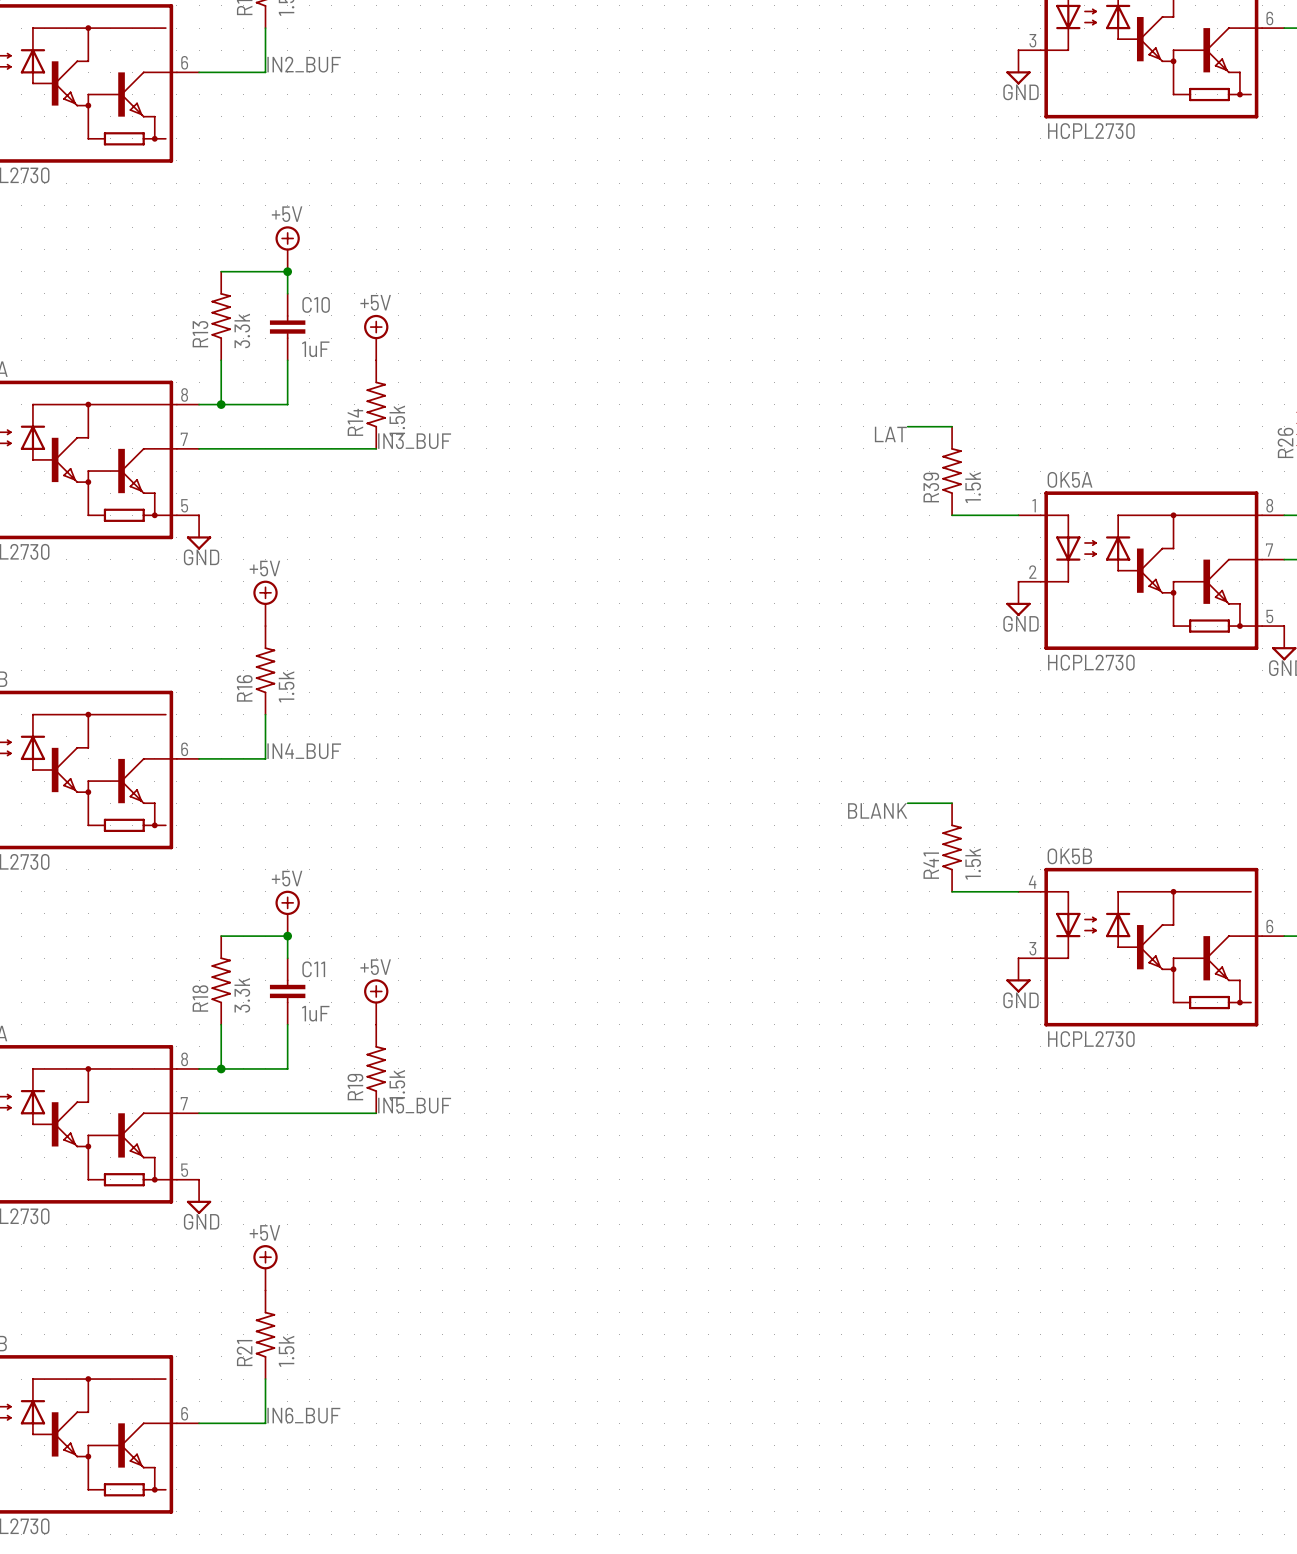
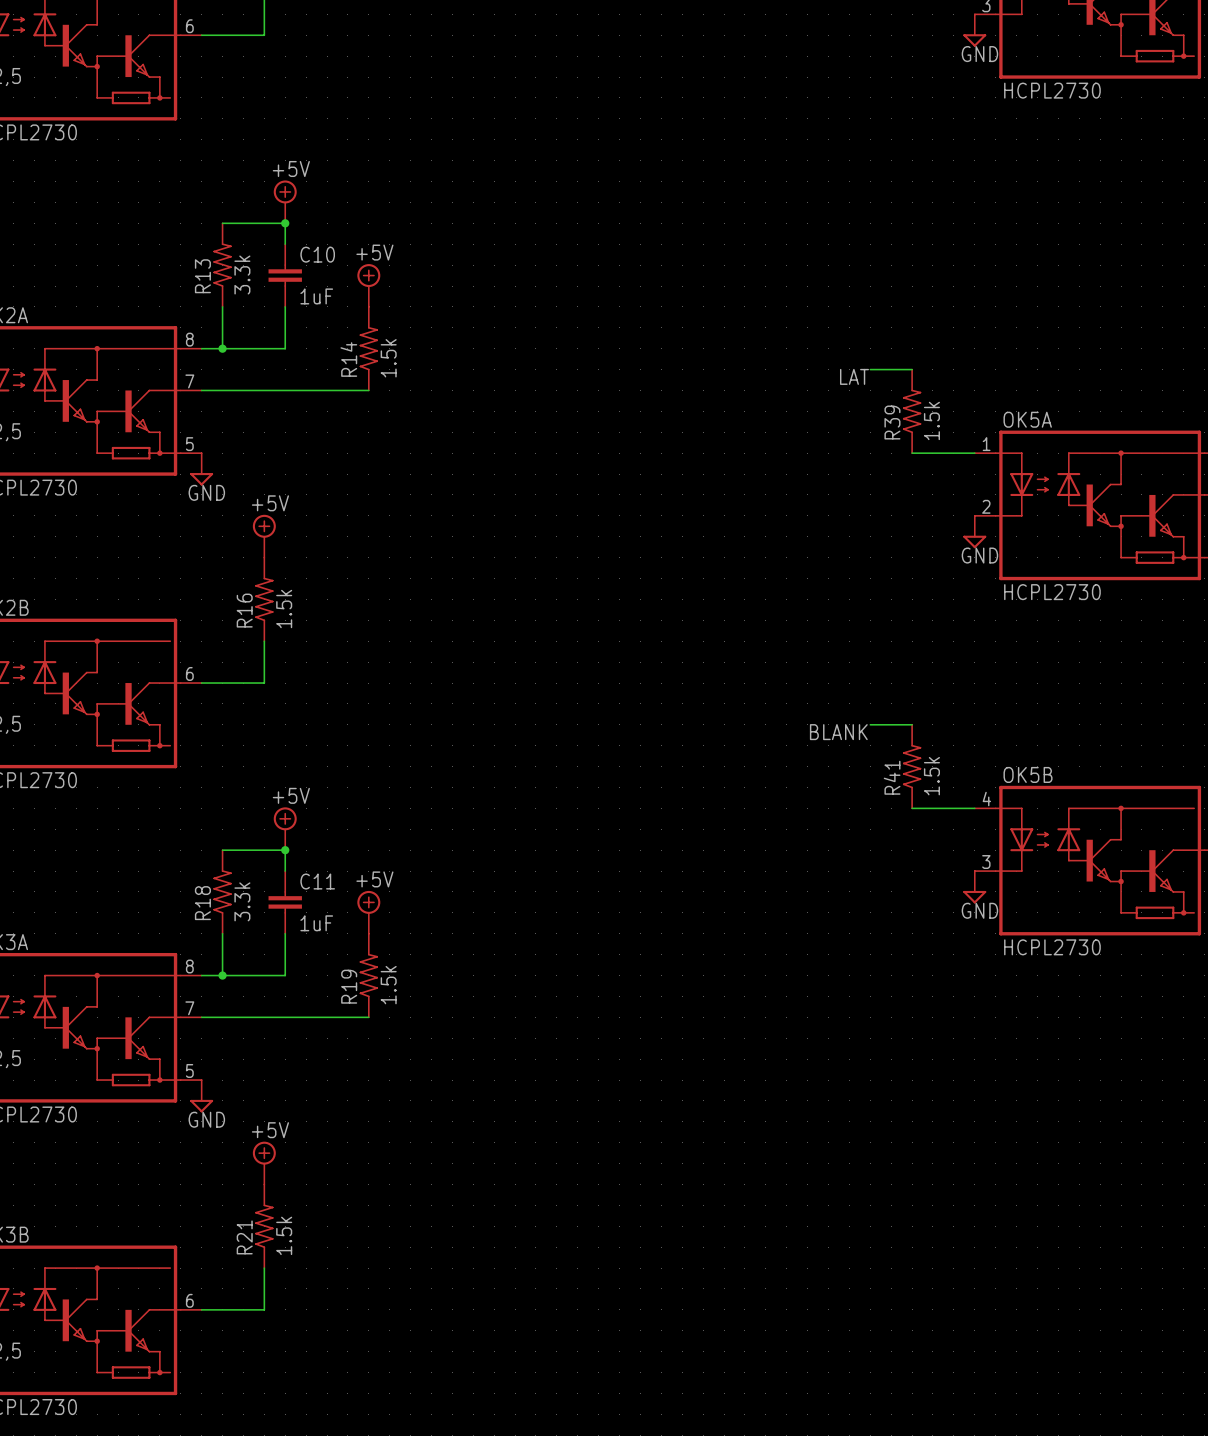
label: IN2_BUF (304, 64) -> none
label: IN3_BUF (414, 441) -> none
label: IN4_BUF (304, 751) -> none
label: IN5_BUF (414, 1105) -> none
label: IN6_BUF (303, 1415) -> none

